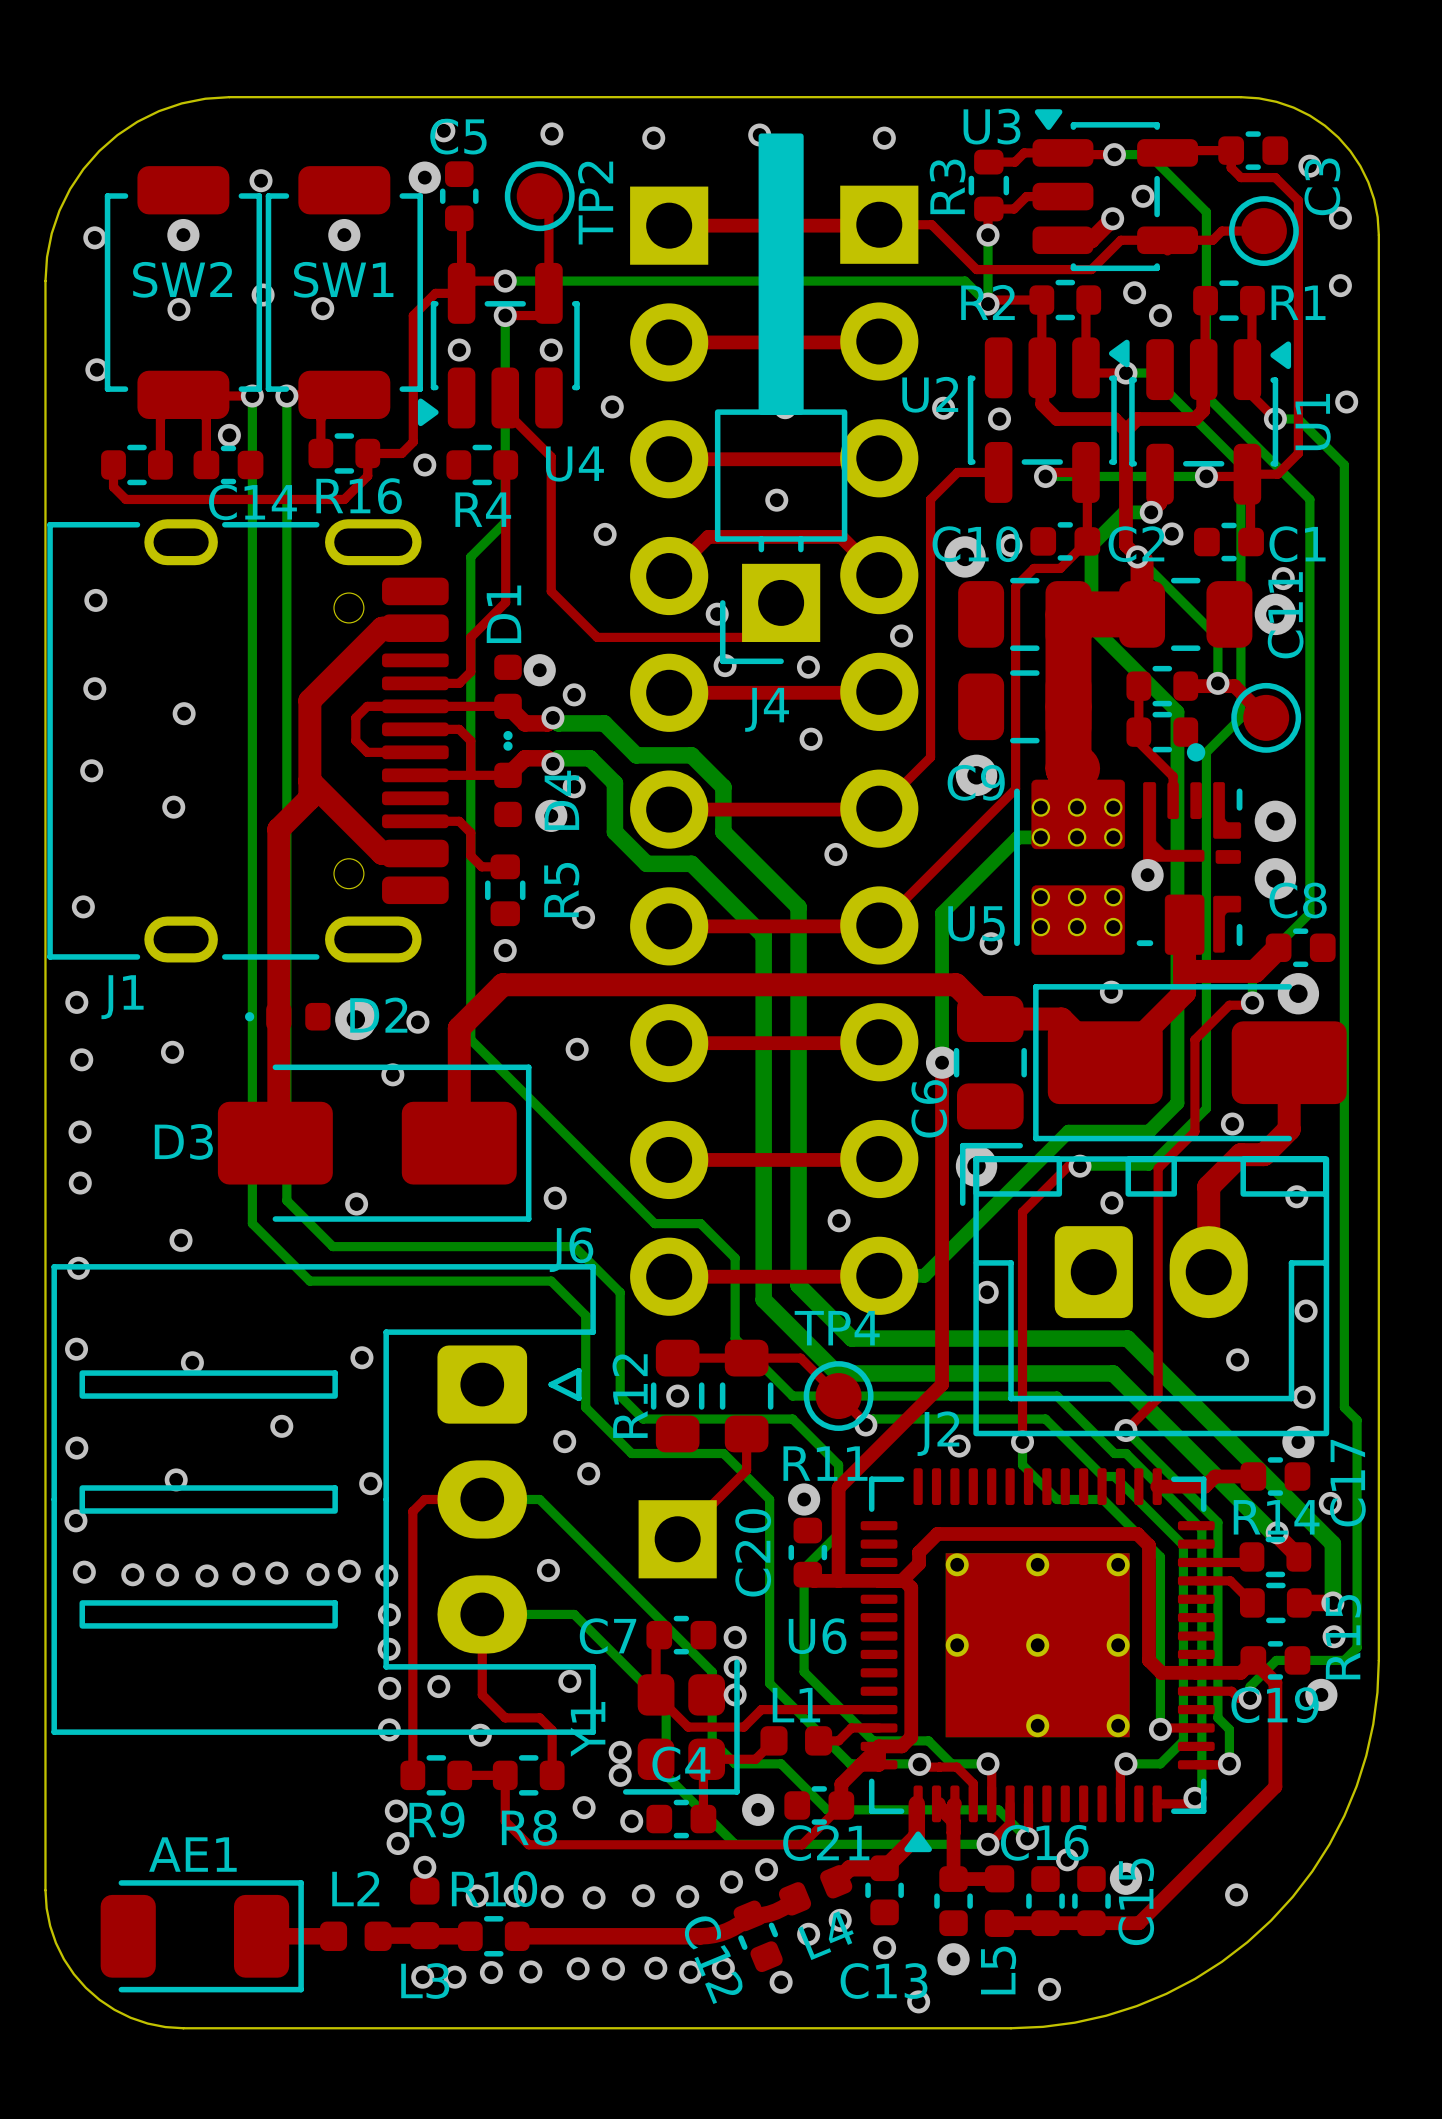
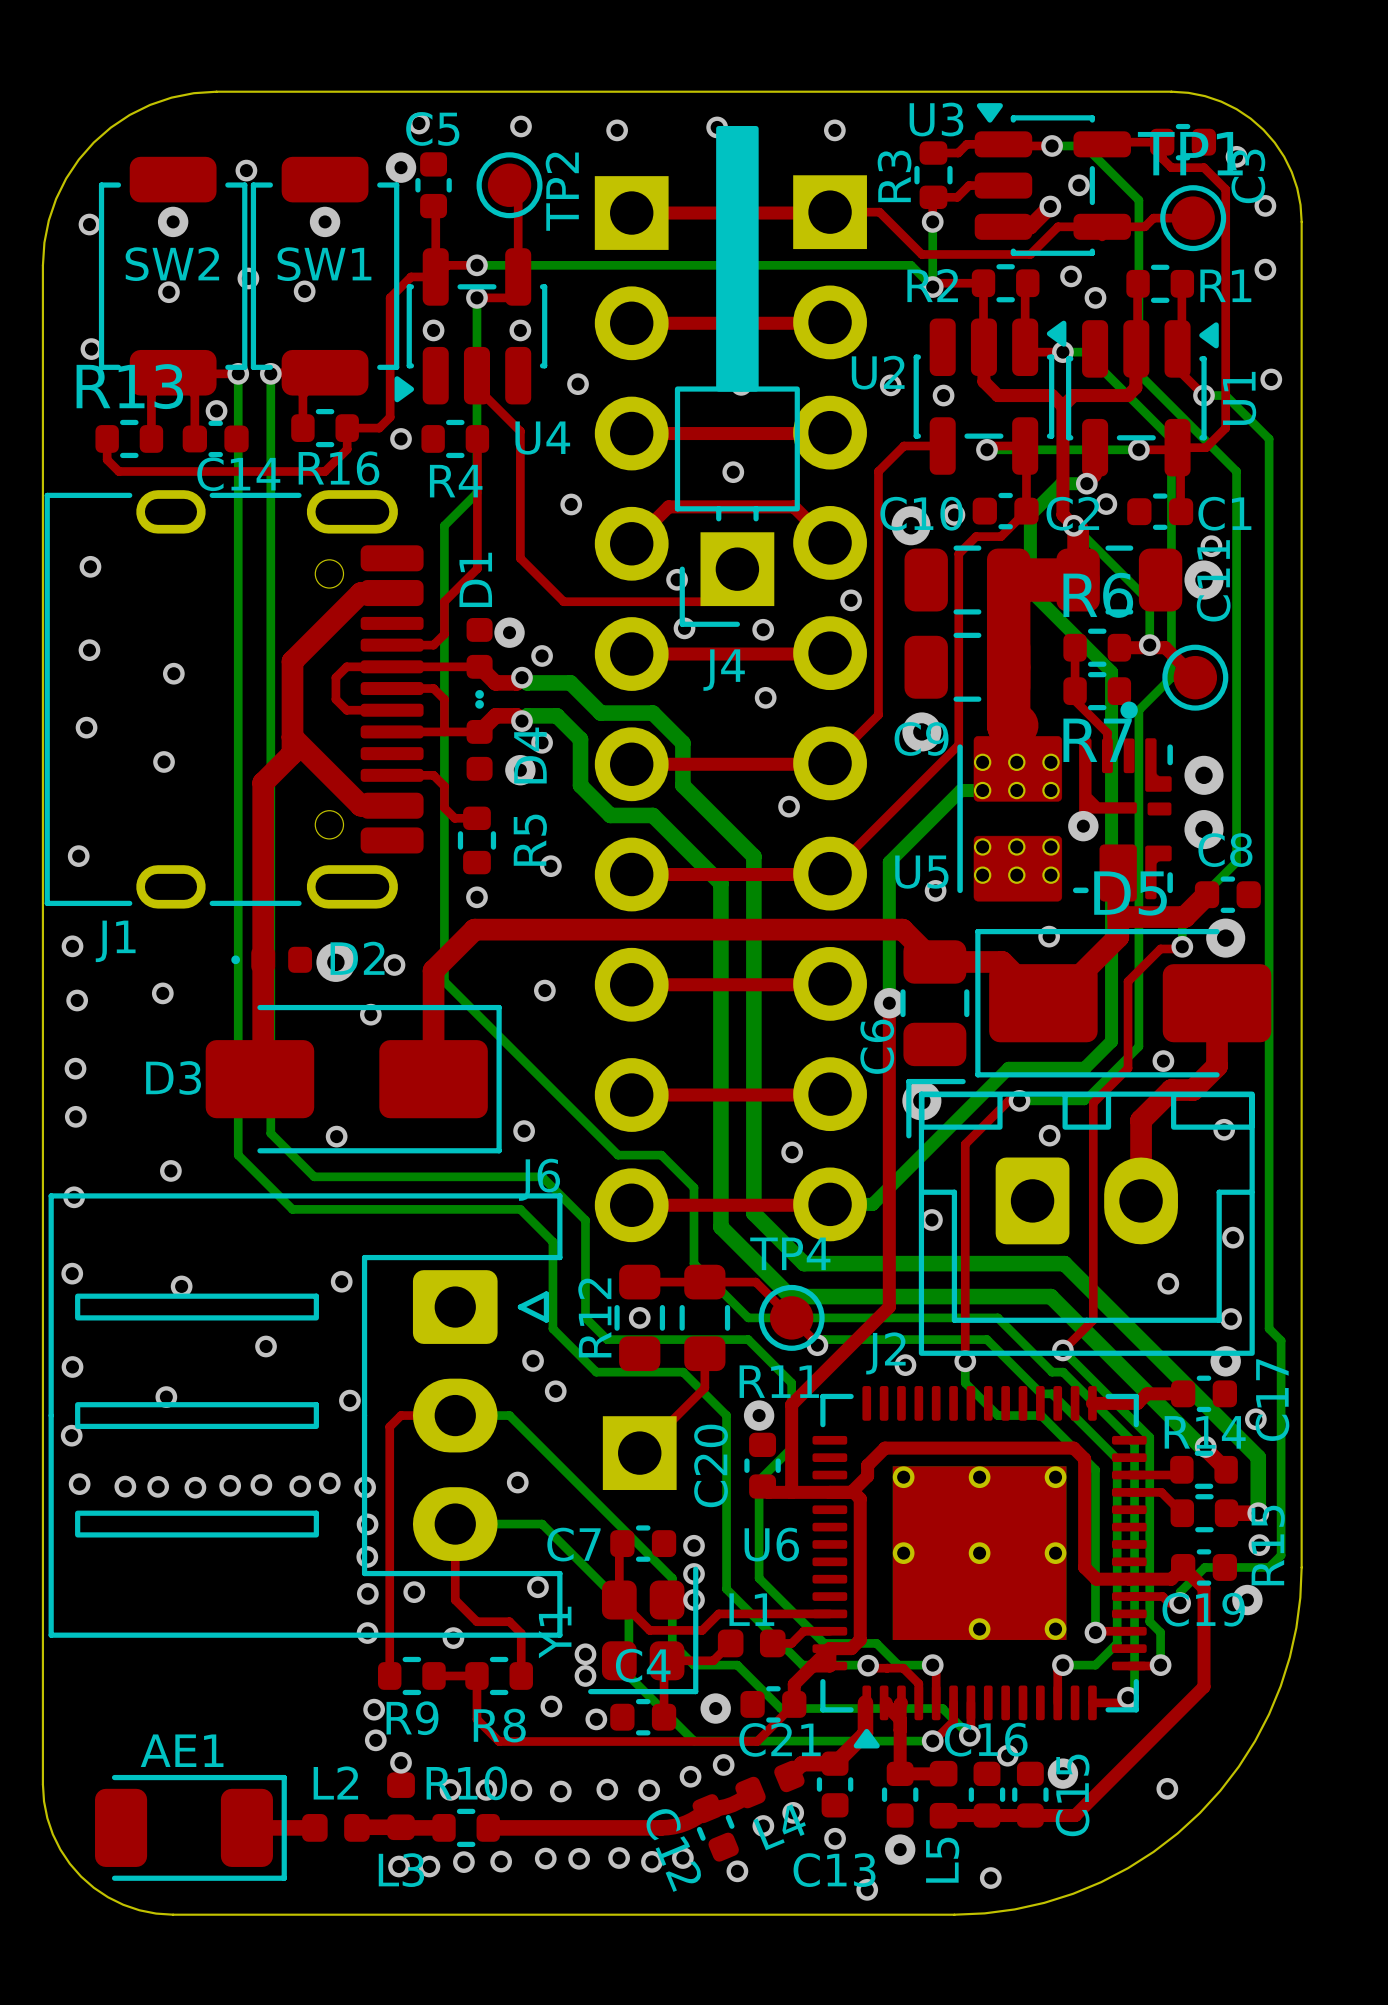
TP1 name: none -> TP1 (1190, 153)
R13 name: none -> R13 (129, 386)
R6 name: none -> R6 (1098, 595)
R7 name: none -> R7 (1097, 740)
D5 name: none -> D5 (1130, 893)

